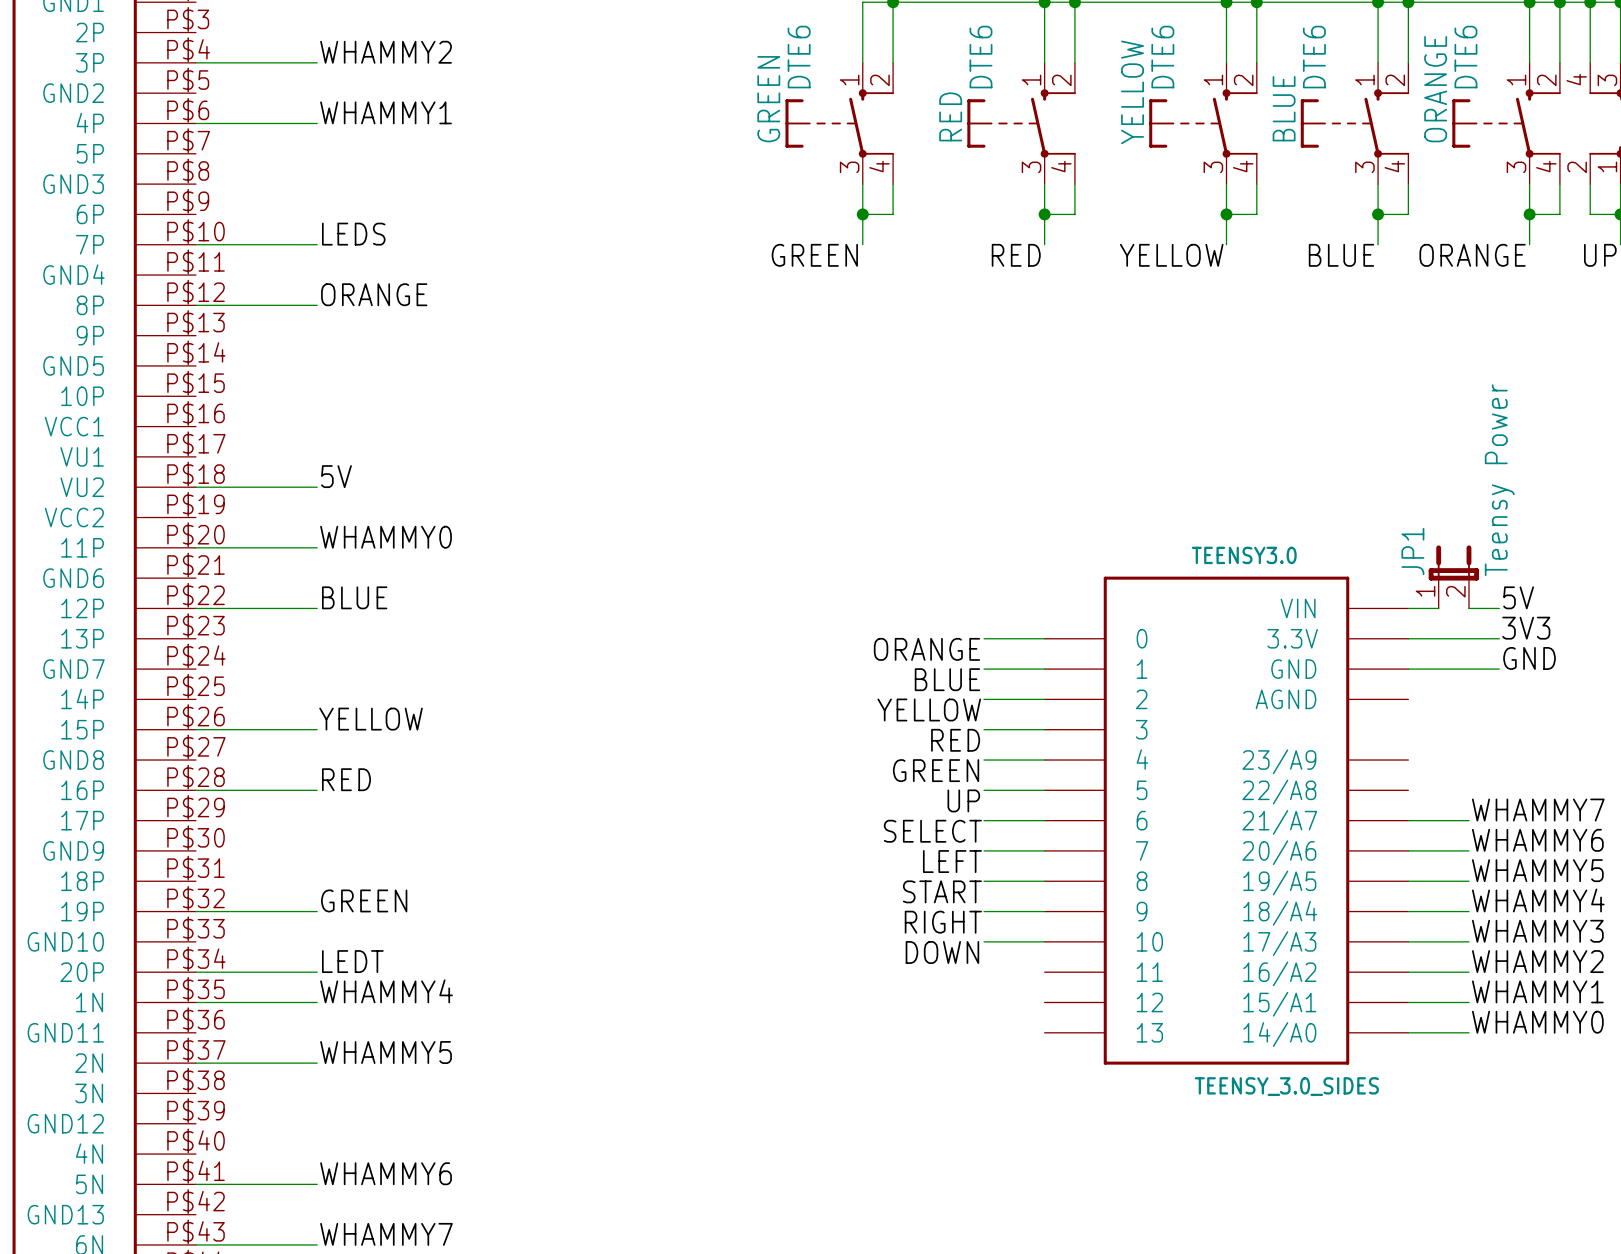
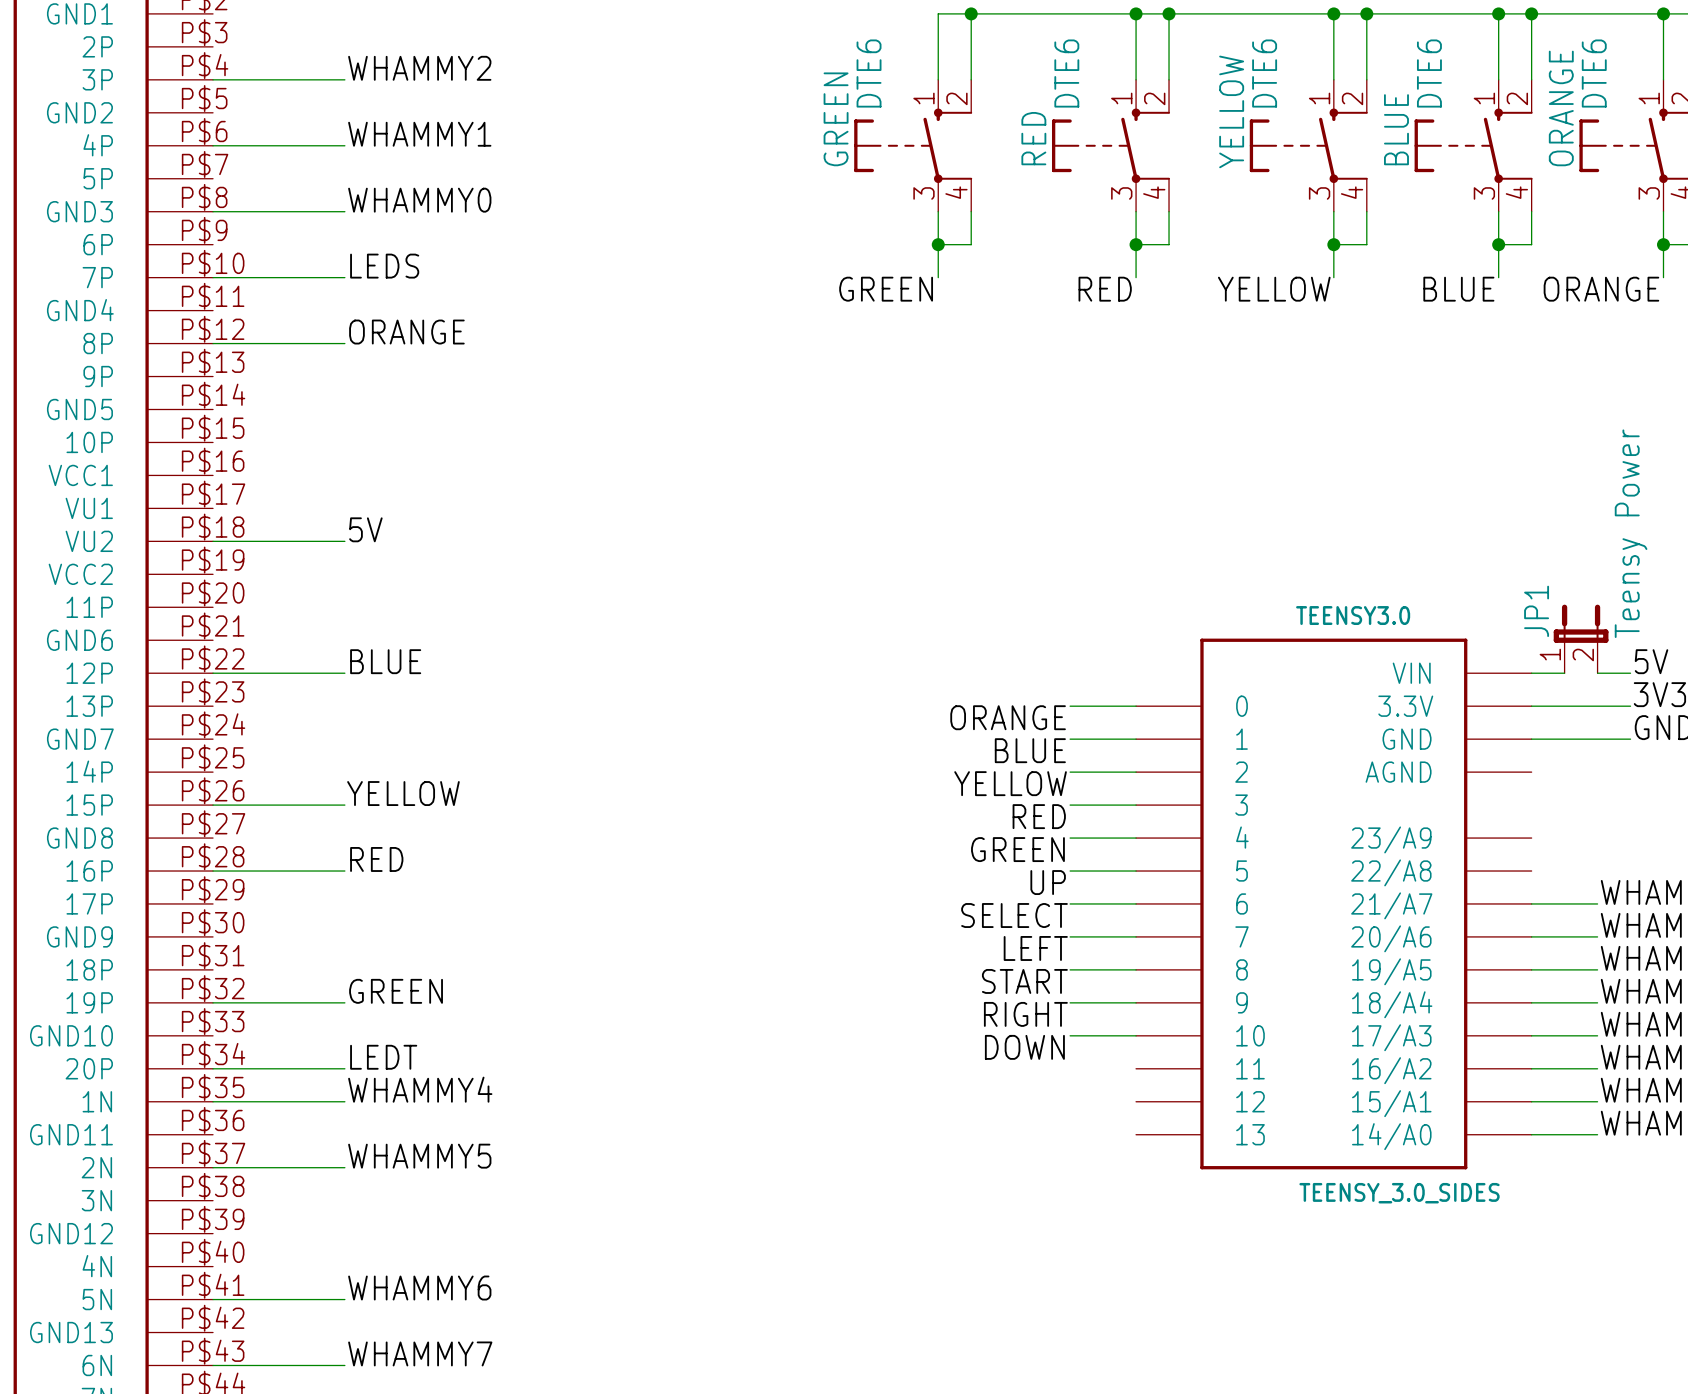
label: none -> WHAMMY0 (419, 200)
wire: none -> (213, 211) (344, 211)
label: WHAMMY0 (386, 537) -> none
wire: (195, 547) (317, 547) -> none

